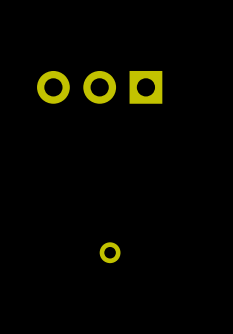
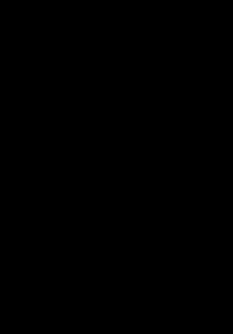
part: (99, 87) -> none
part: (110, 252) -> none

